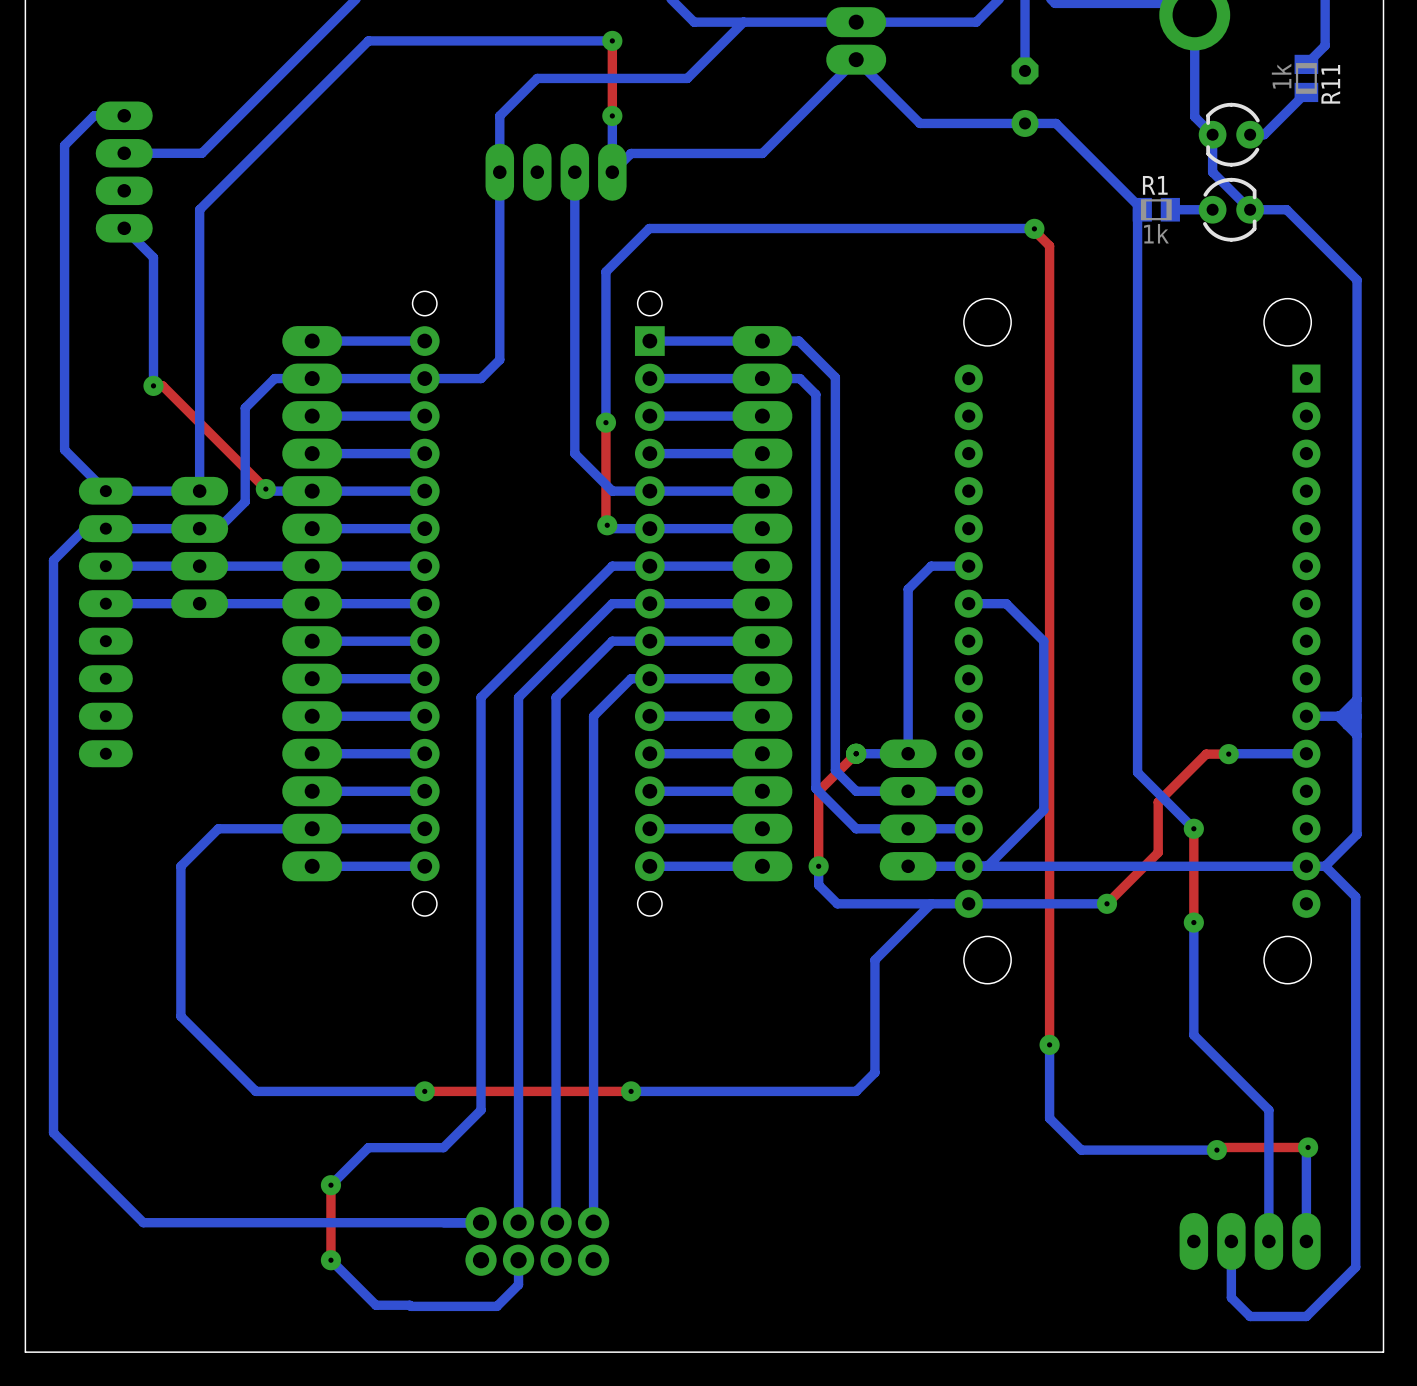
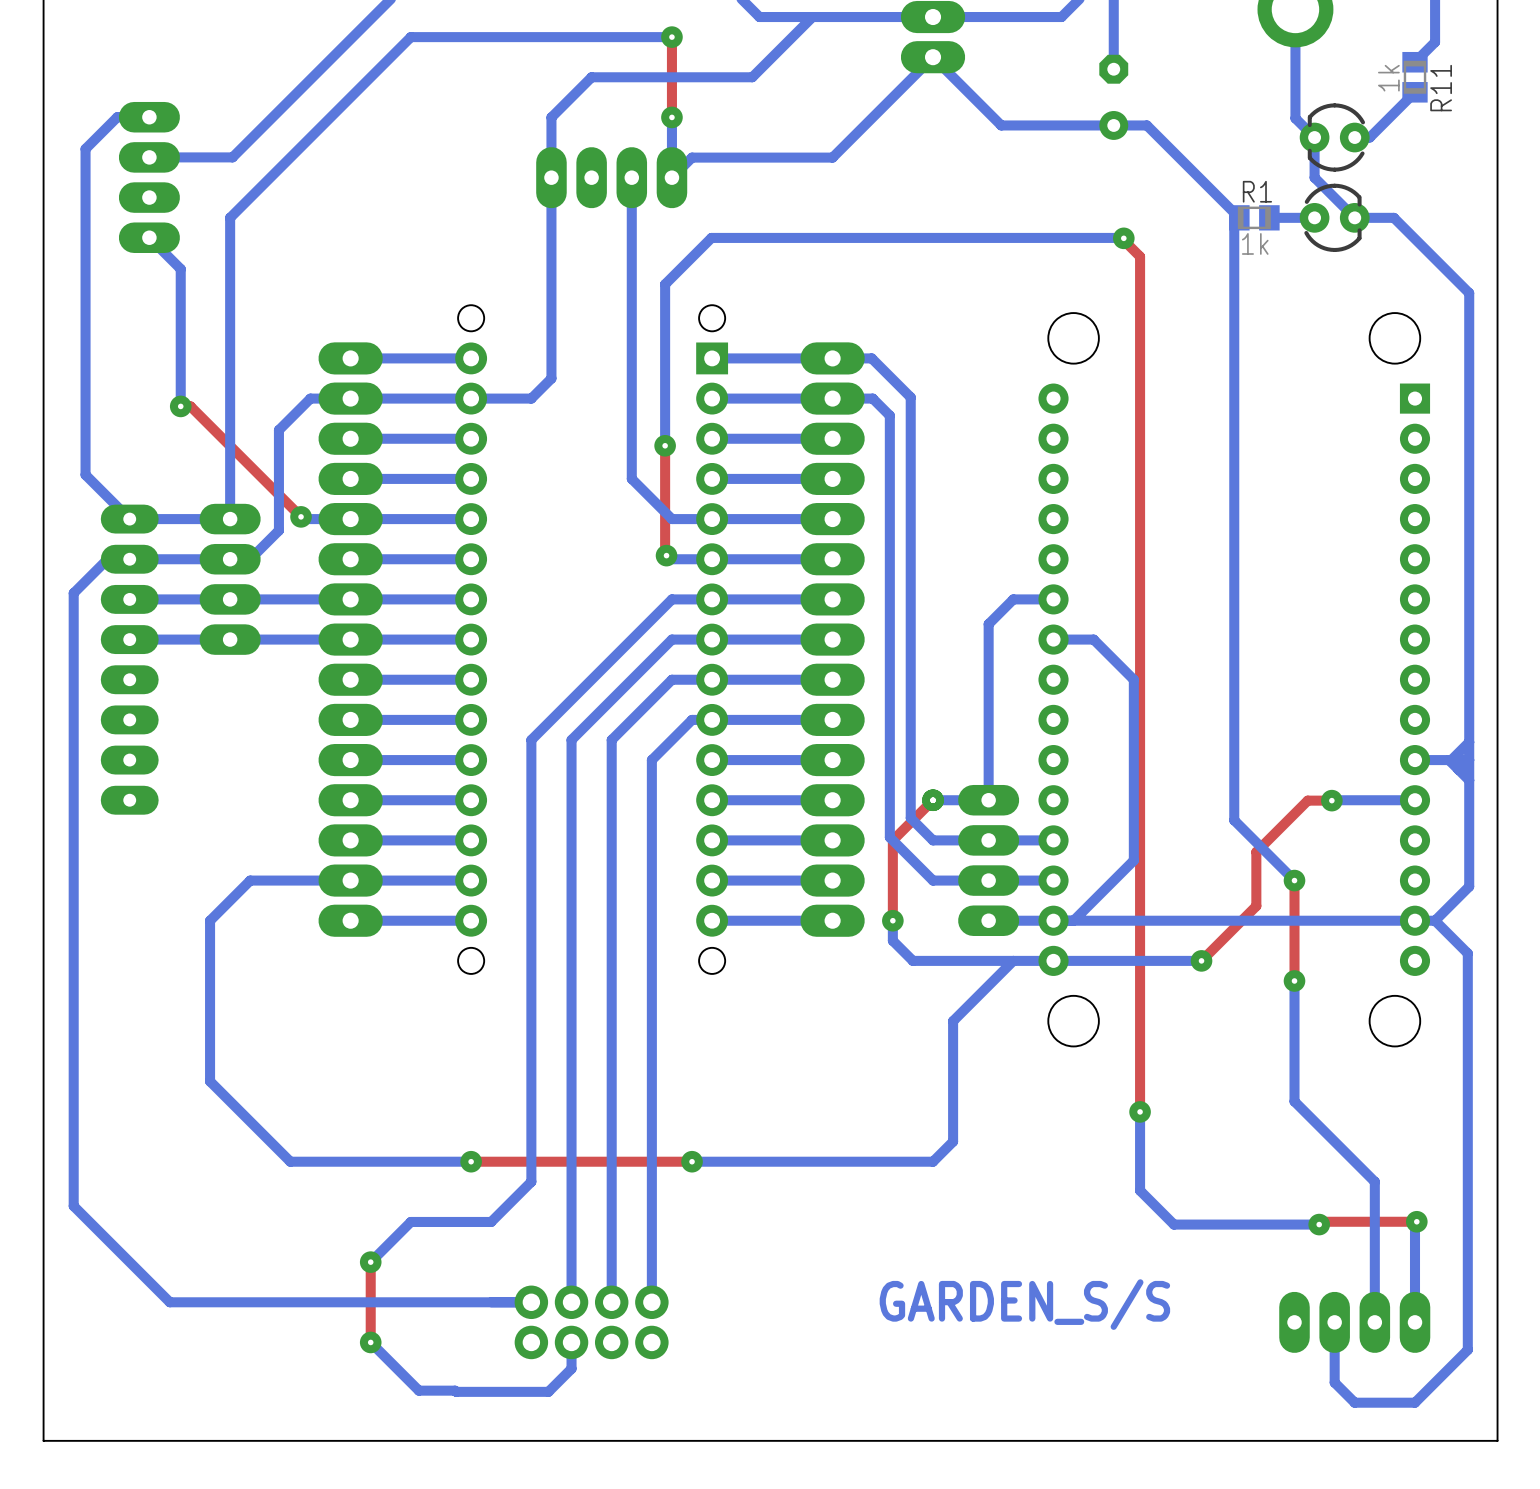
text: none -> GARDEN_S/S (1024, 1304)

